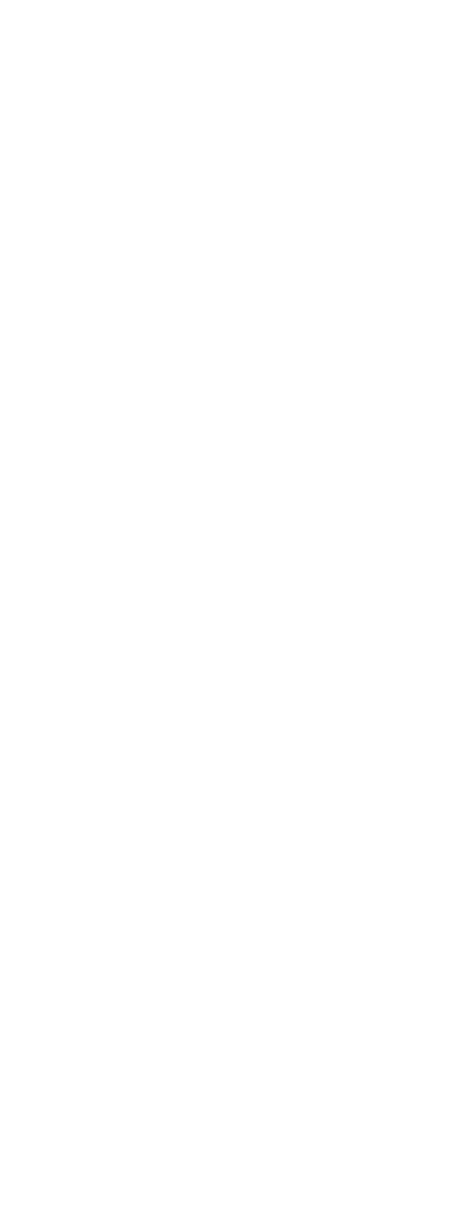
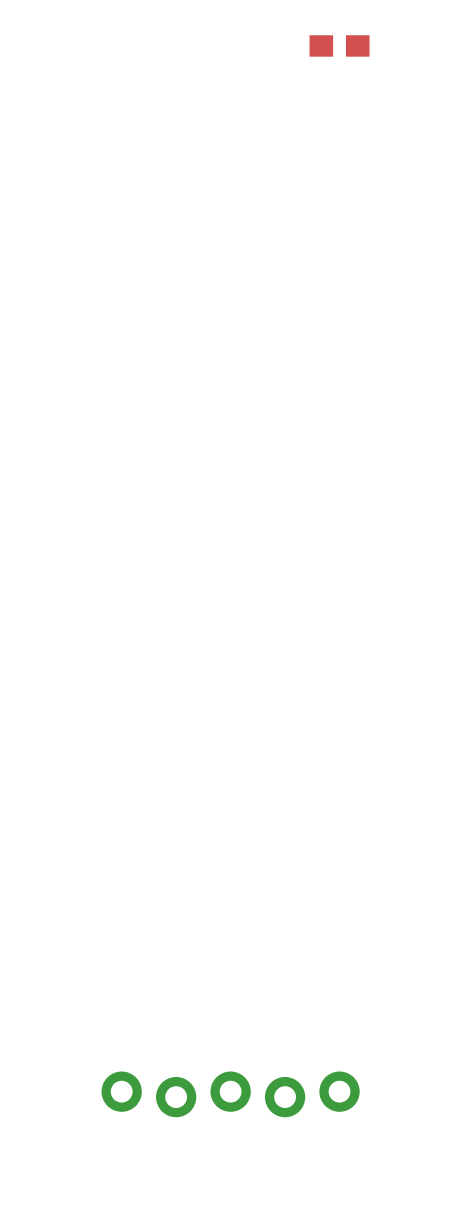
part: none -> (339, 45)
part: none -> (230, 1094)

